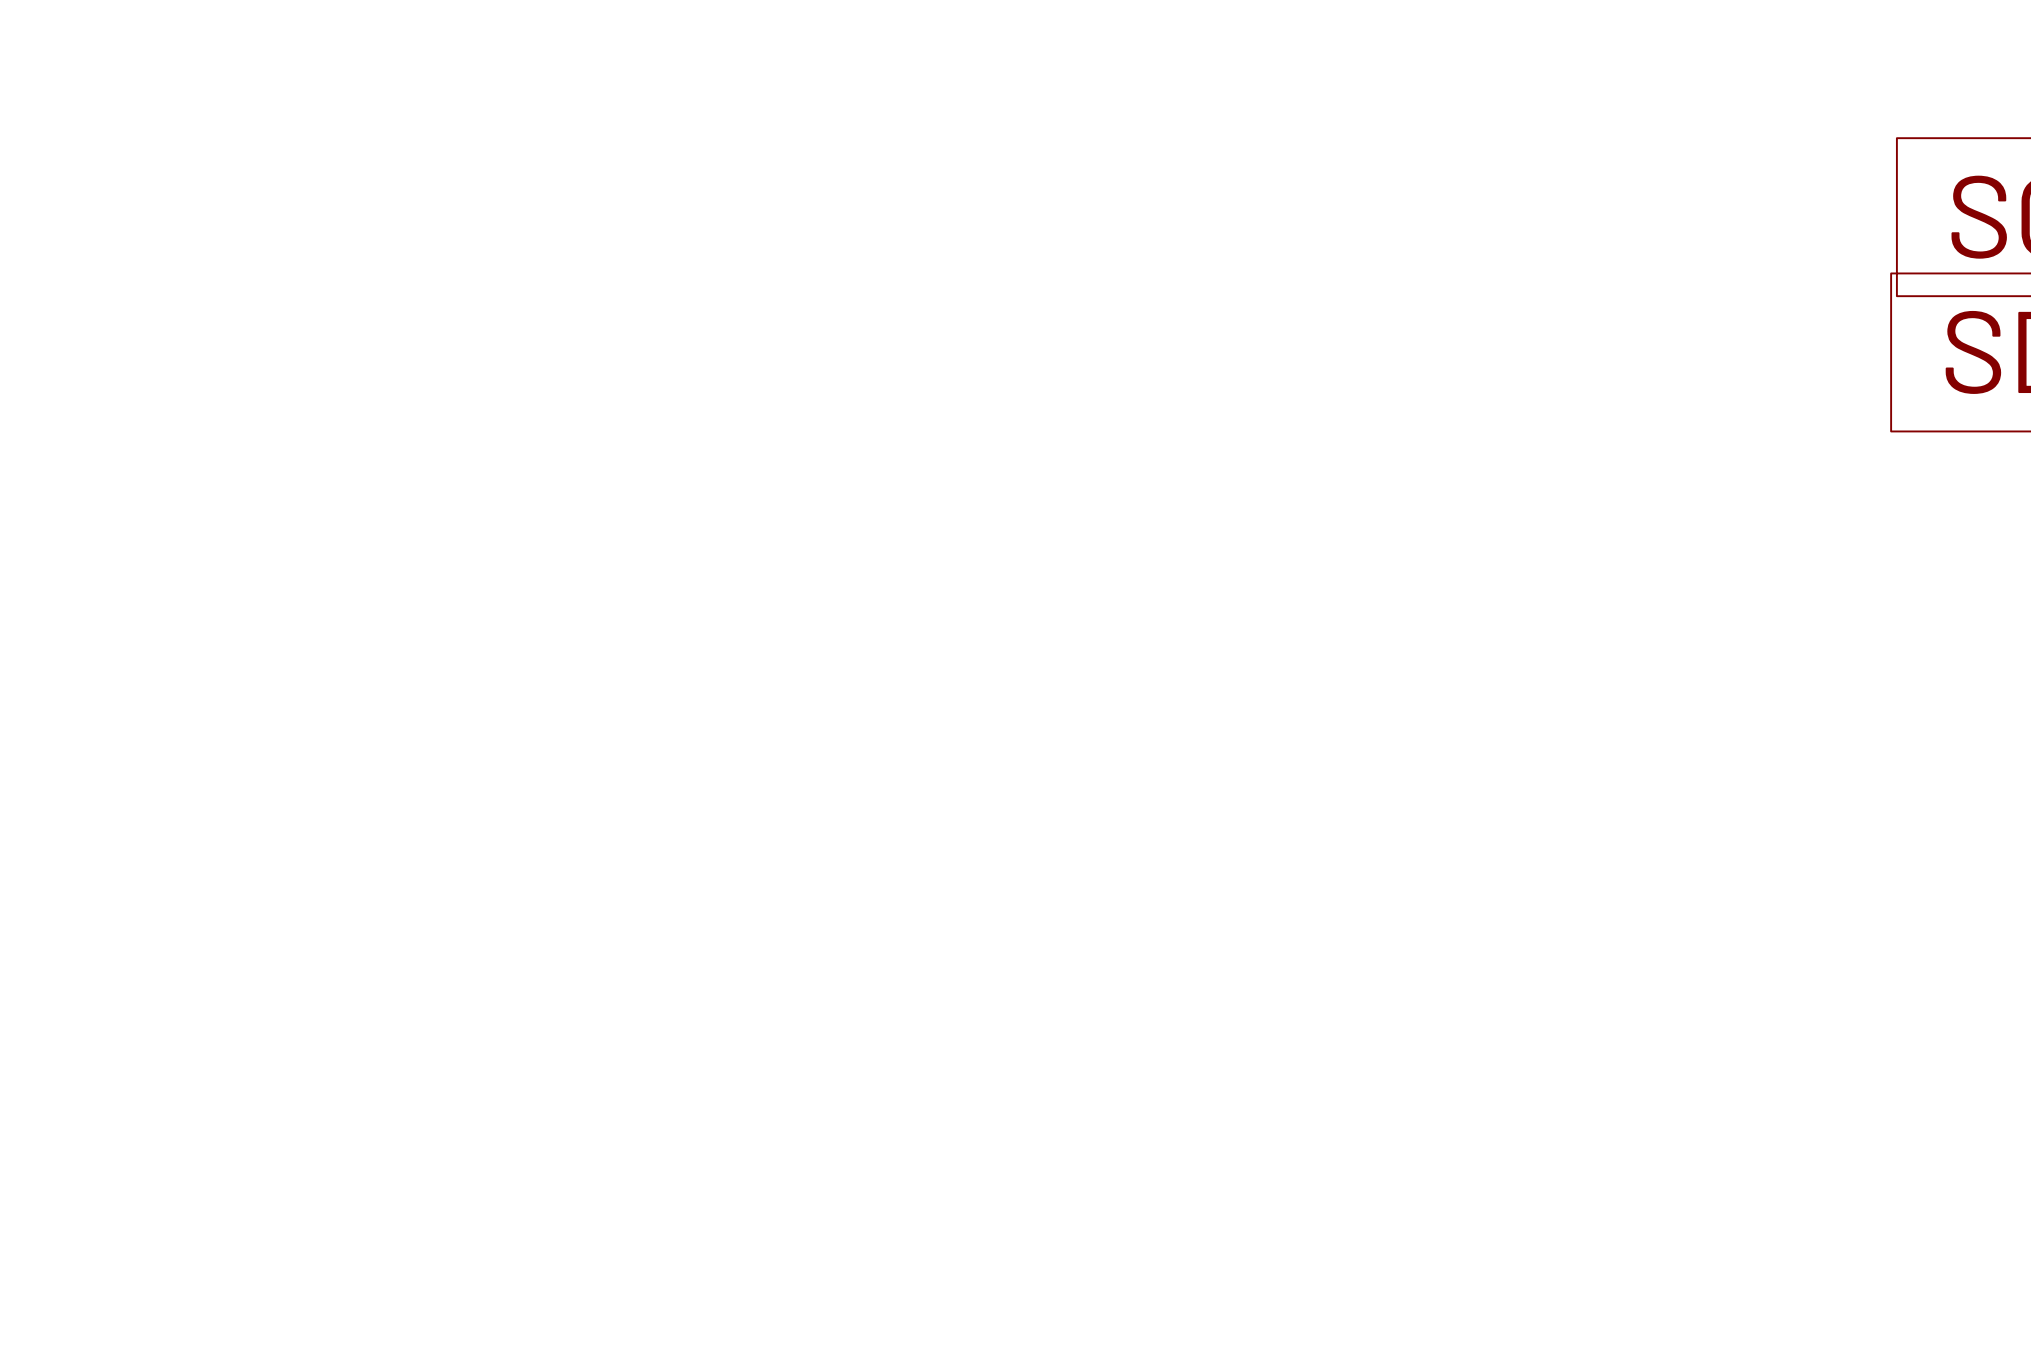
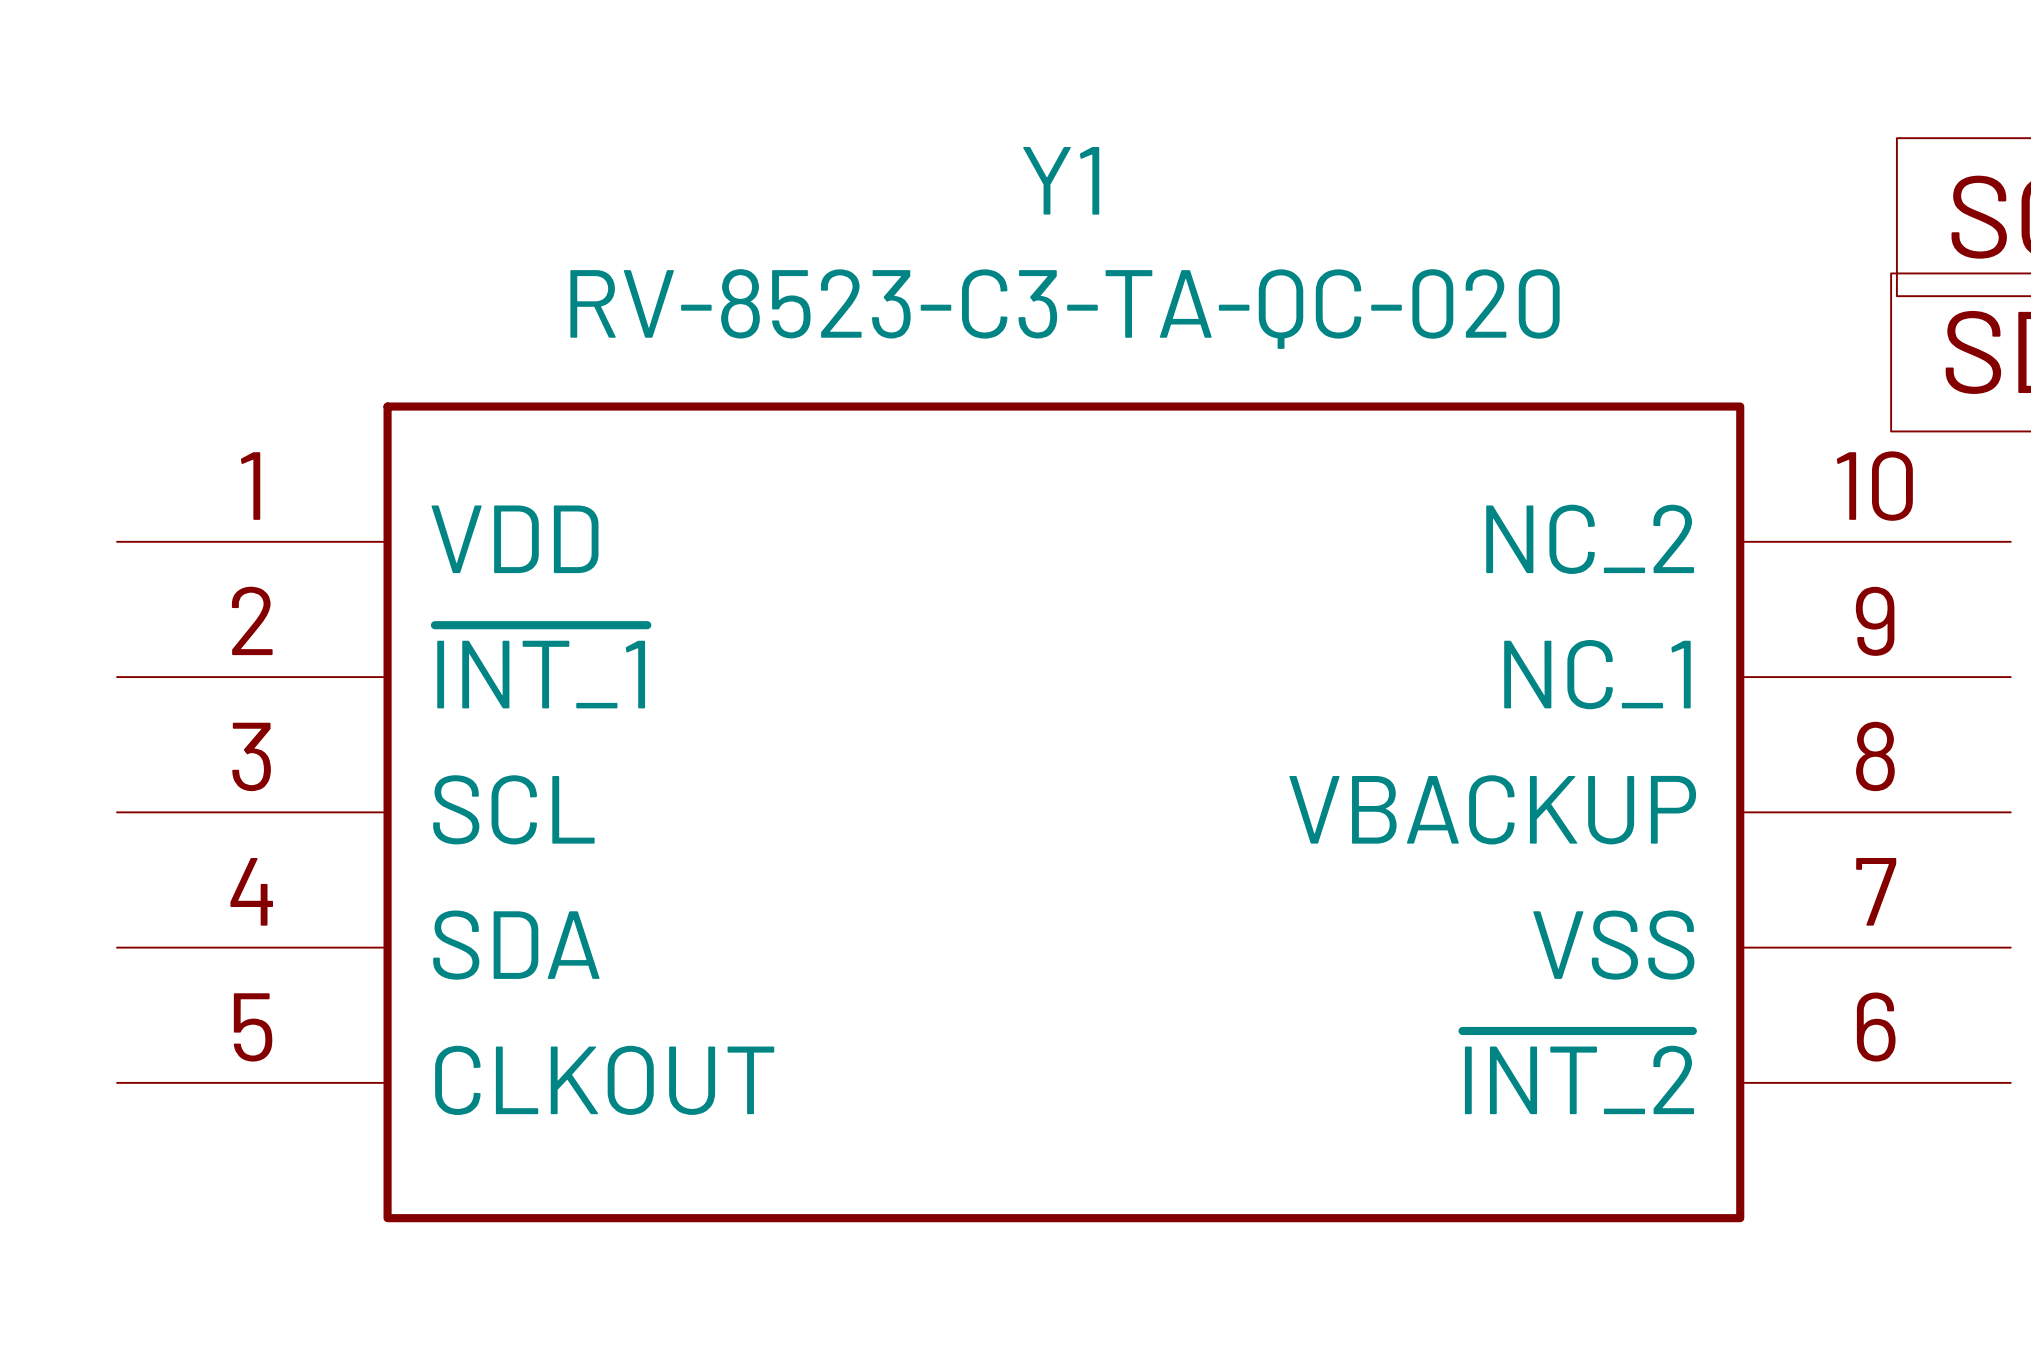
Y1: none -> RV-8523-C3-TA-QC-020 (1063, 812)

